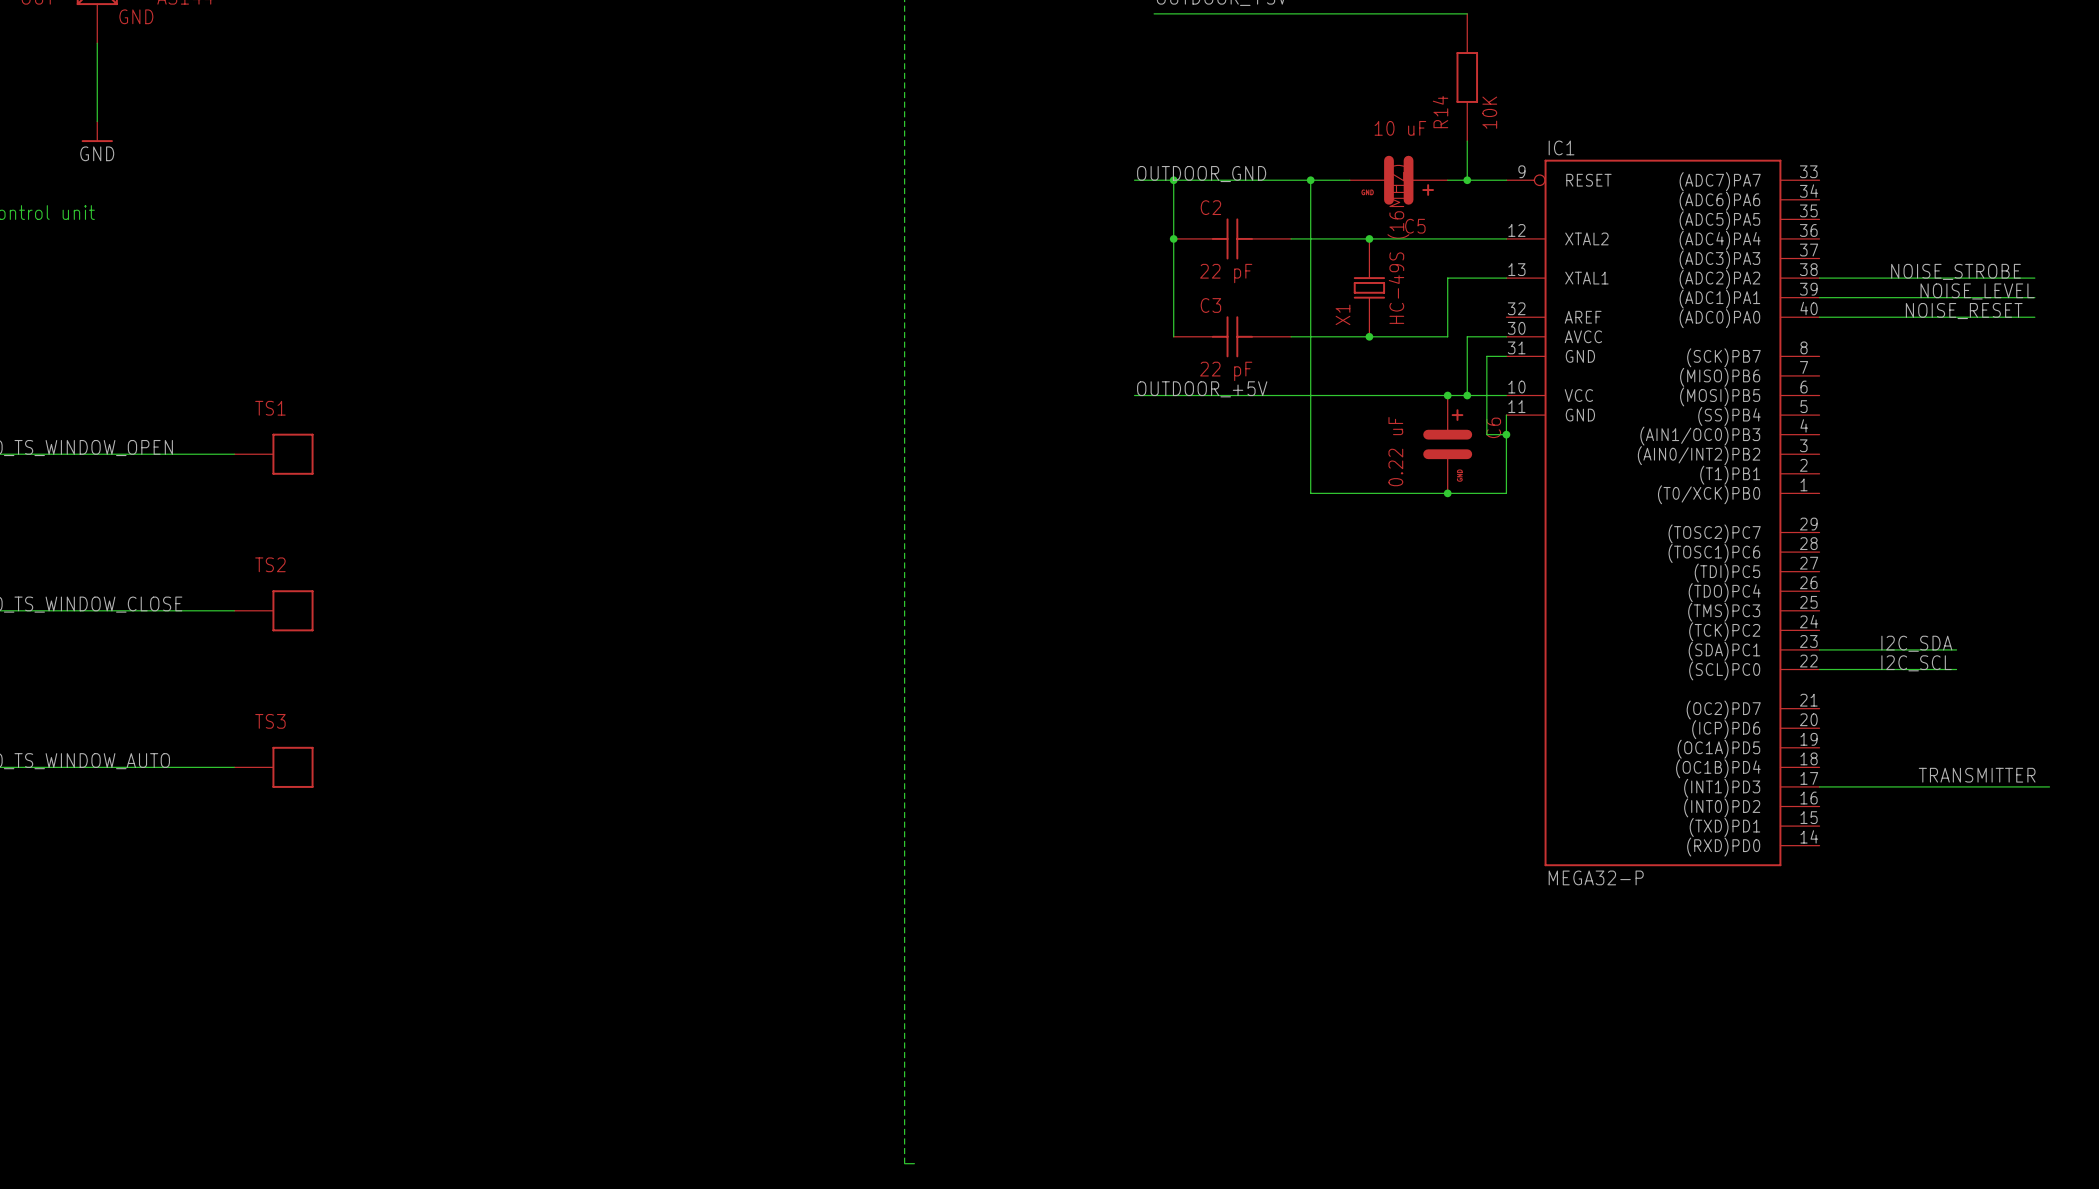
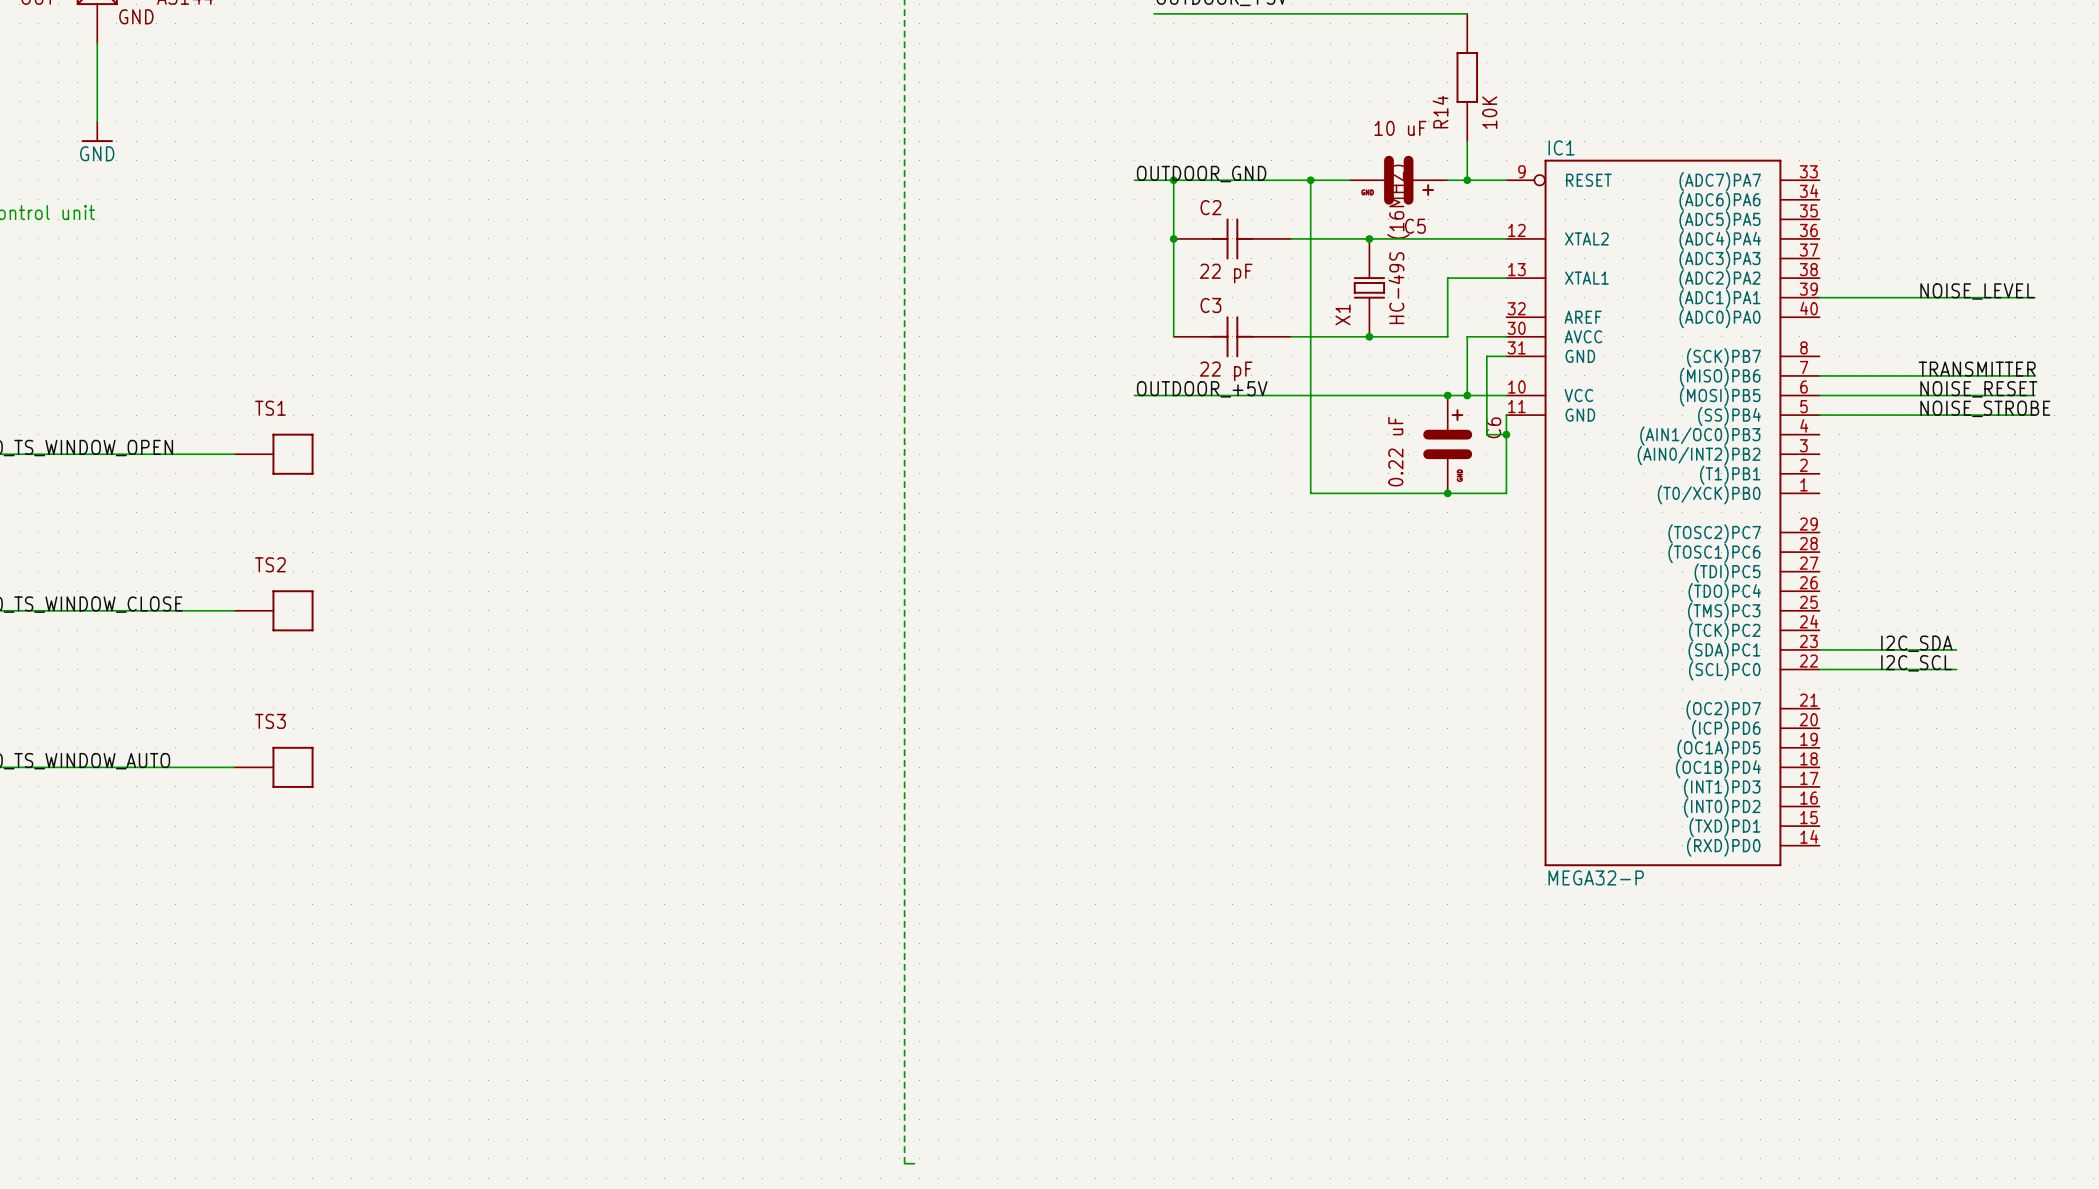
label position: NOISE_STROBE (1956, 271) -> NOISE_STROBE (1985, 408)
wire: (1819, 278) (2034, 278) -> (1819, 375) (2034, 375)
label position: NOISE_RESET (1964, 311) -> NOISE_RESET (1978, 389)
wire: (1819, 317) (2034, 317) -> (1819, 415) (2034, 415)
label: none -> TRANSMITTER (1977, 369)
wire: none -> (1819, 395) (2034, 395)
label: TRANSMITTER (1977, 775) -> none
wire: (1819, 786) (2049, 786) -> none

